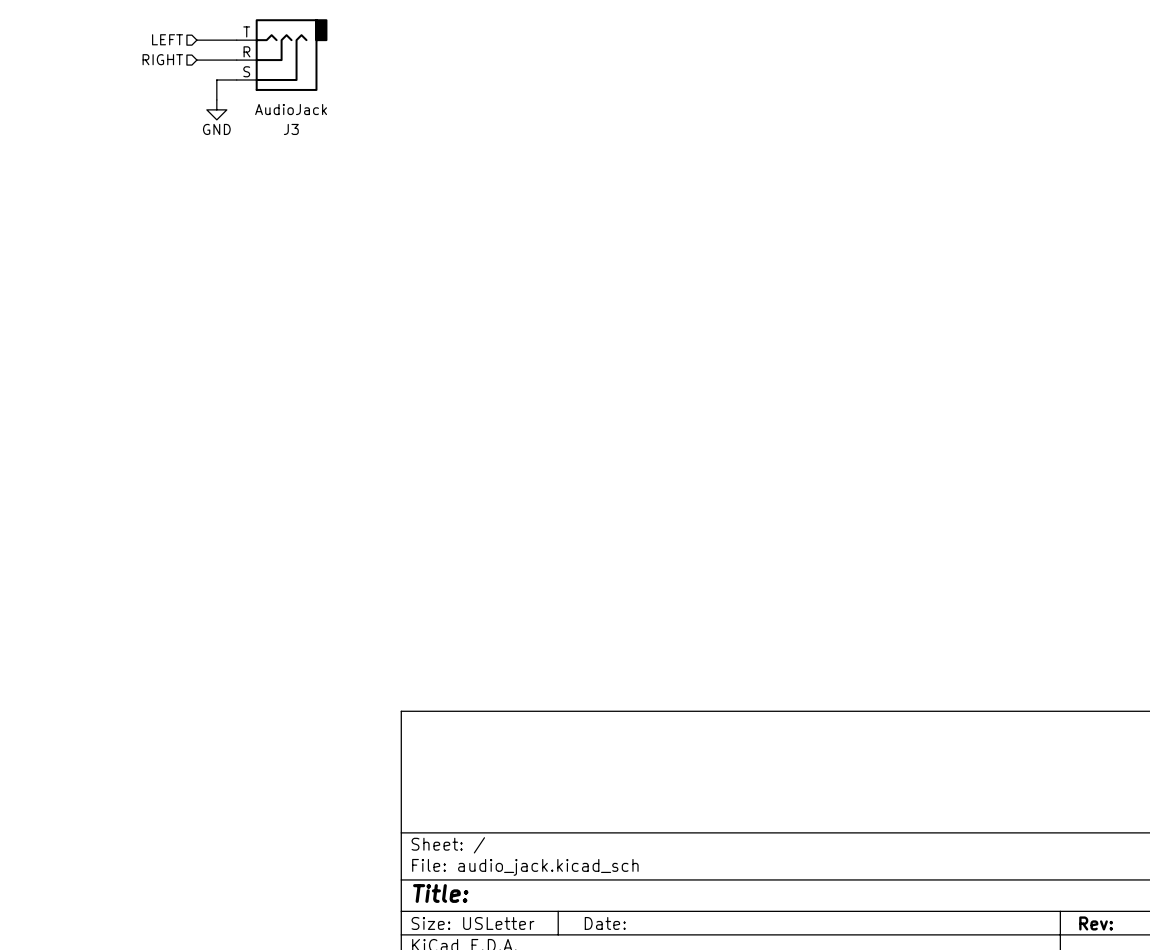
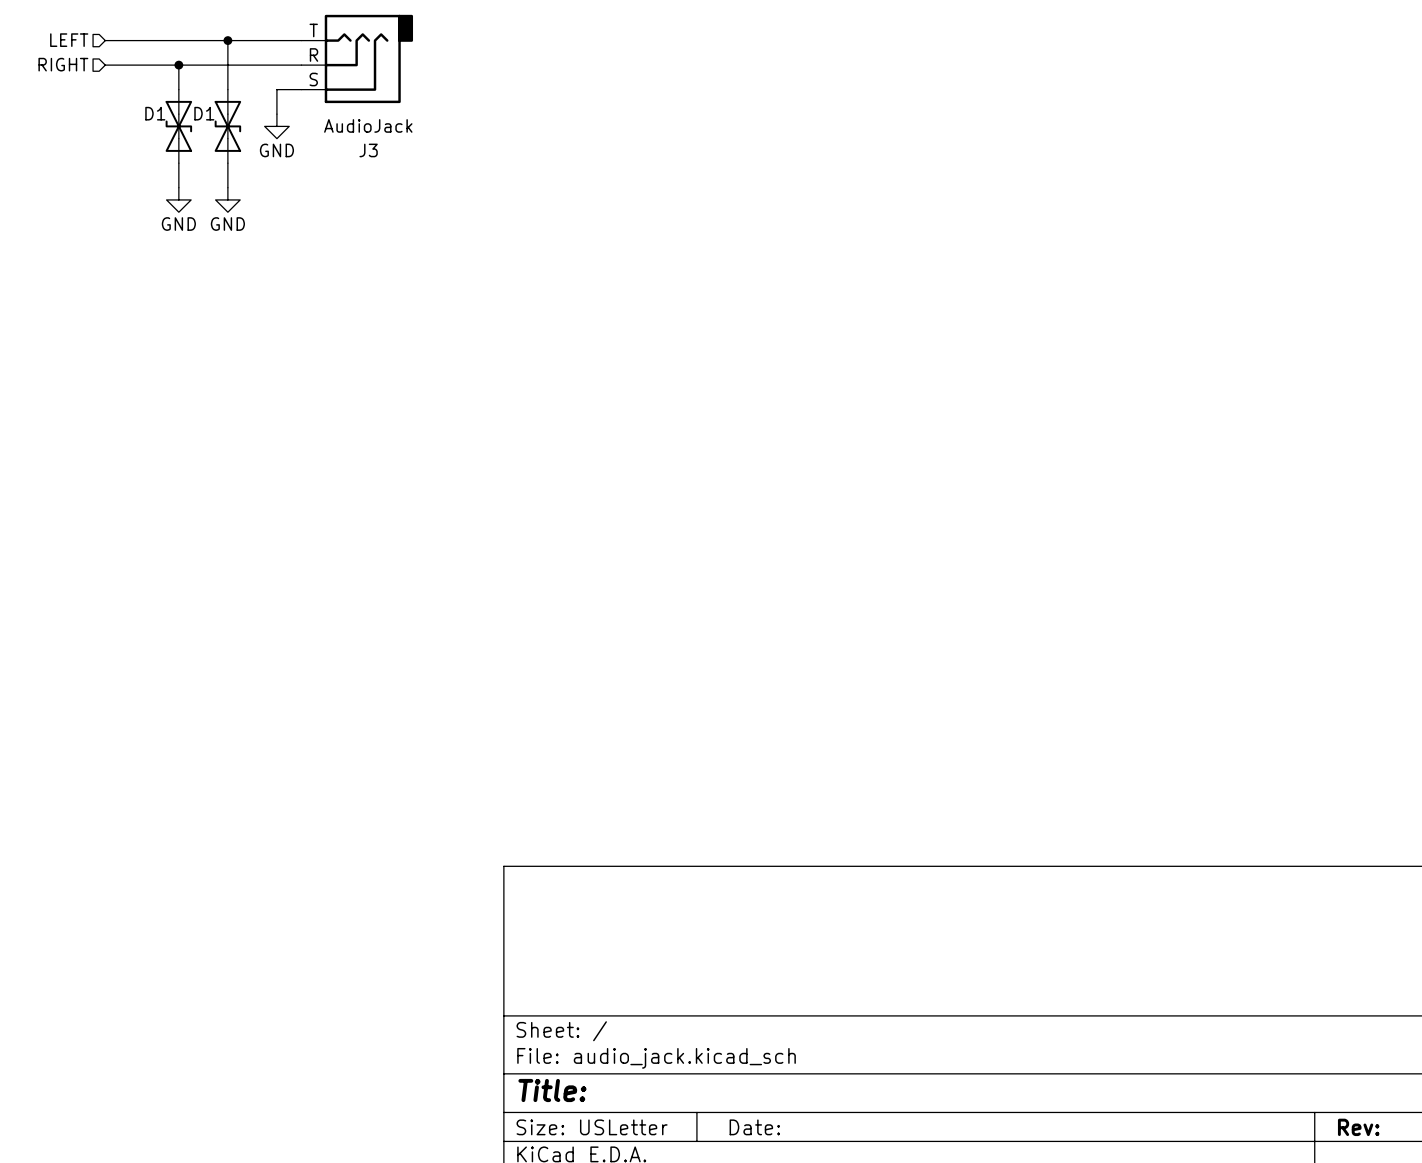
hierarchical label position: LEFT (167, 39) -> LEFT (69, 40)
wire: none -> (105, 40) (252, 40)
wire: none -> (227, 40) (227, 89)
junction: none -> (227, 40)
hierarchical label position: RIGHT (162, 59) -> RIGHT (63, 64)
wire: none -> (105, 65) (252, 65)
wire: none -> (178, 65) (178, 89)
junction: none -> (178, 65)
D1: none -> (178, 126)
D1: none -> (227, 126)
wire: none -> (178, 163) (178, 187)
wire: none -> (227, 163) (227, 187)
power symbol: none -> GND (178, 199)
power symbol: none -> GND (227, 199)

